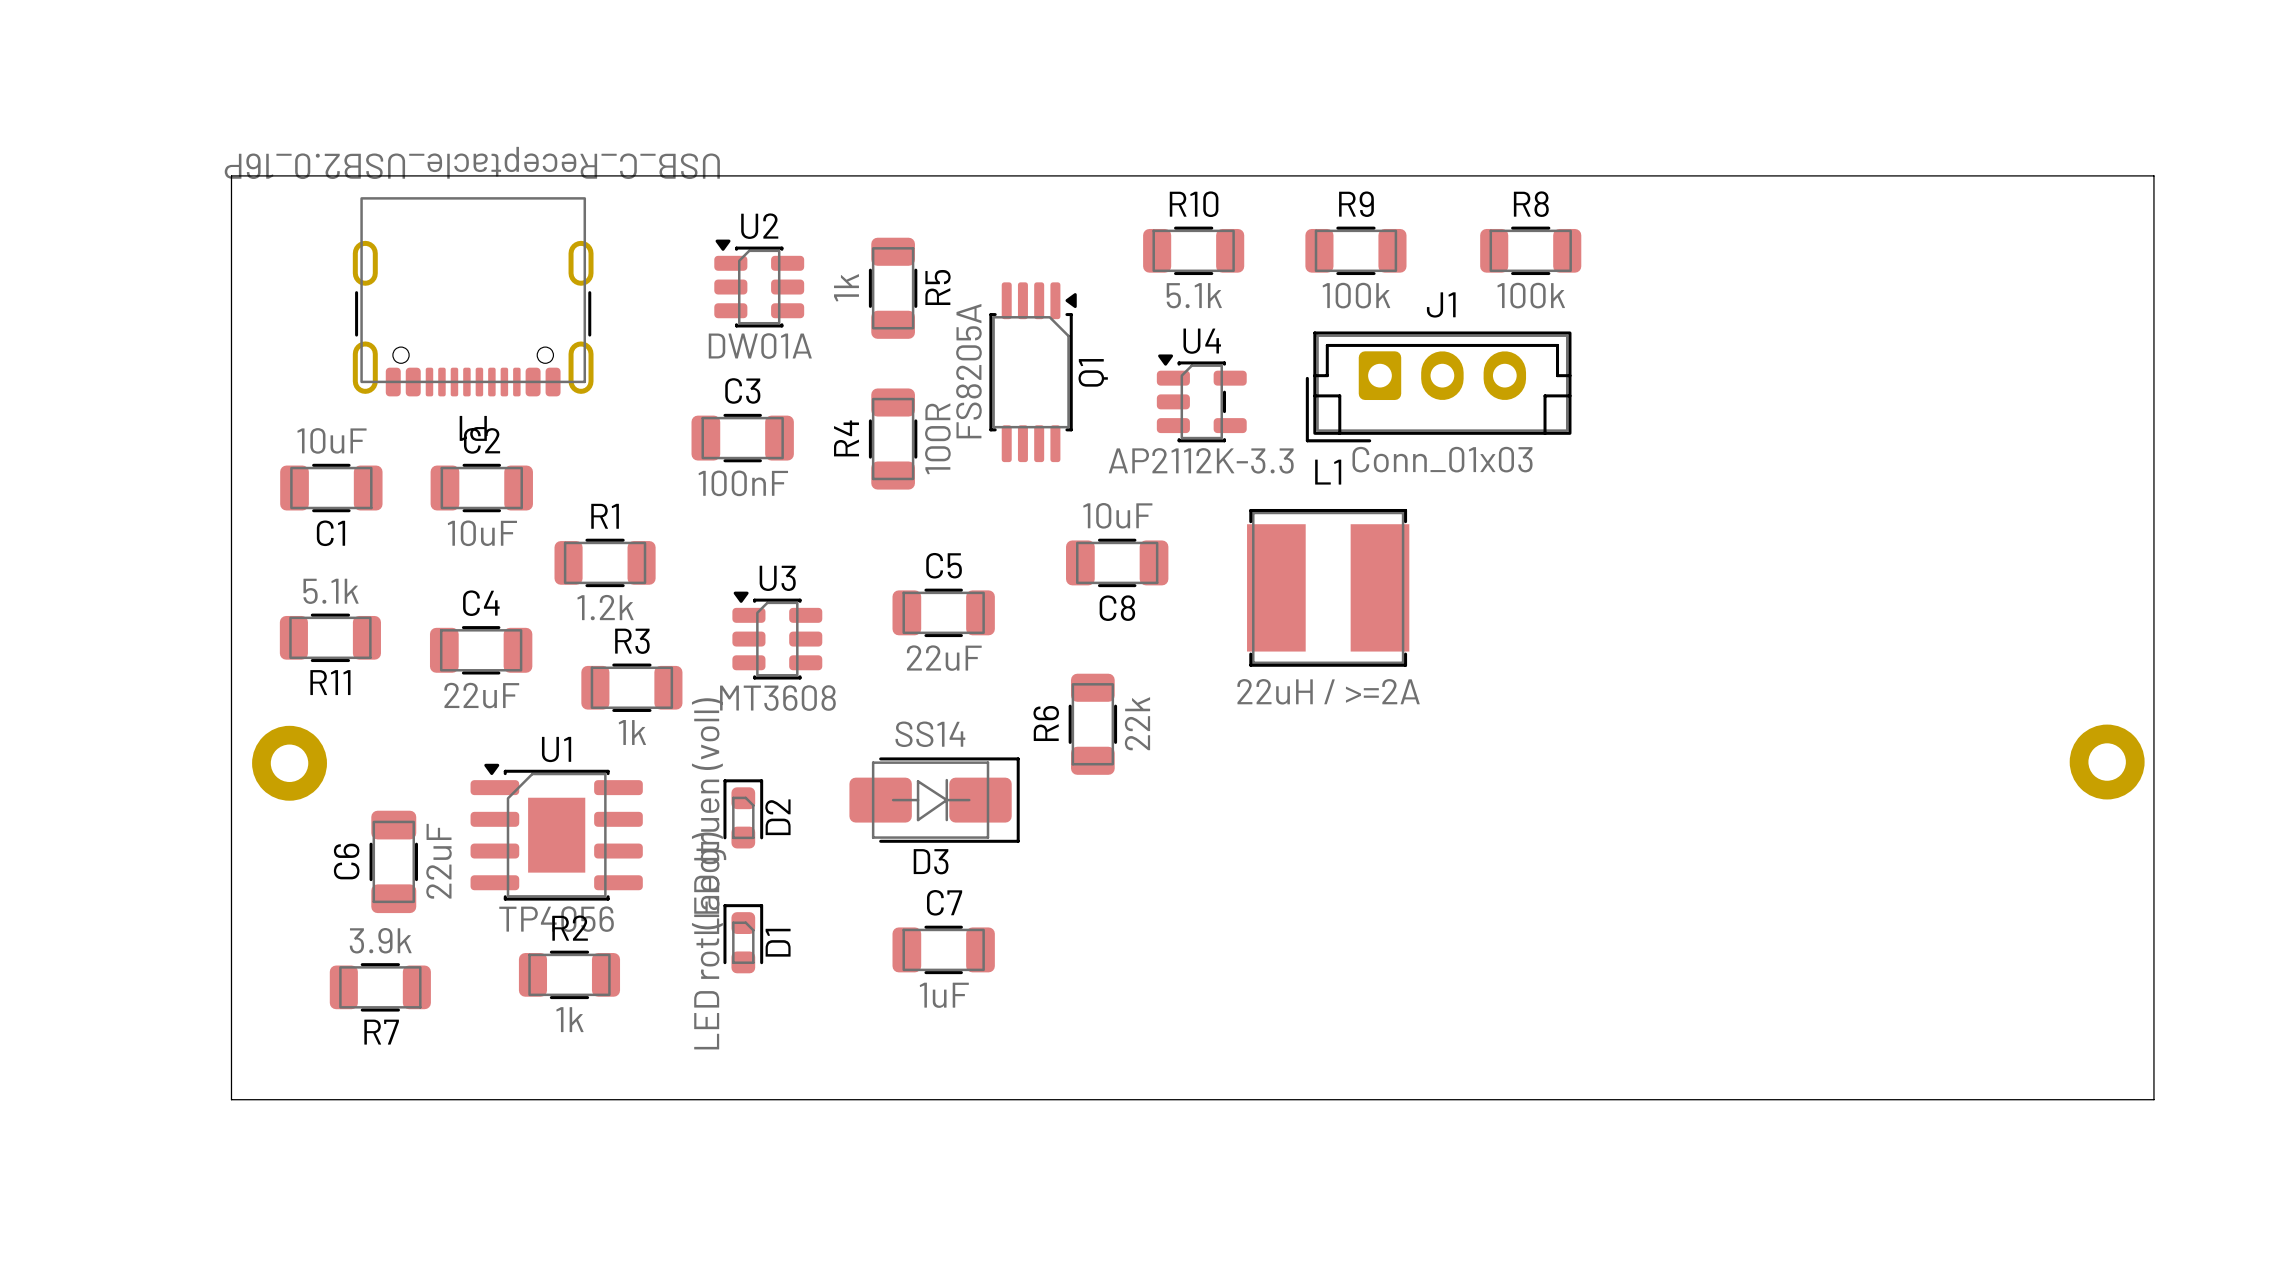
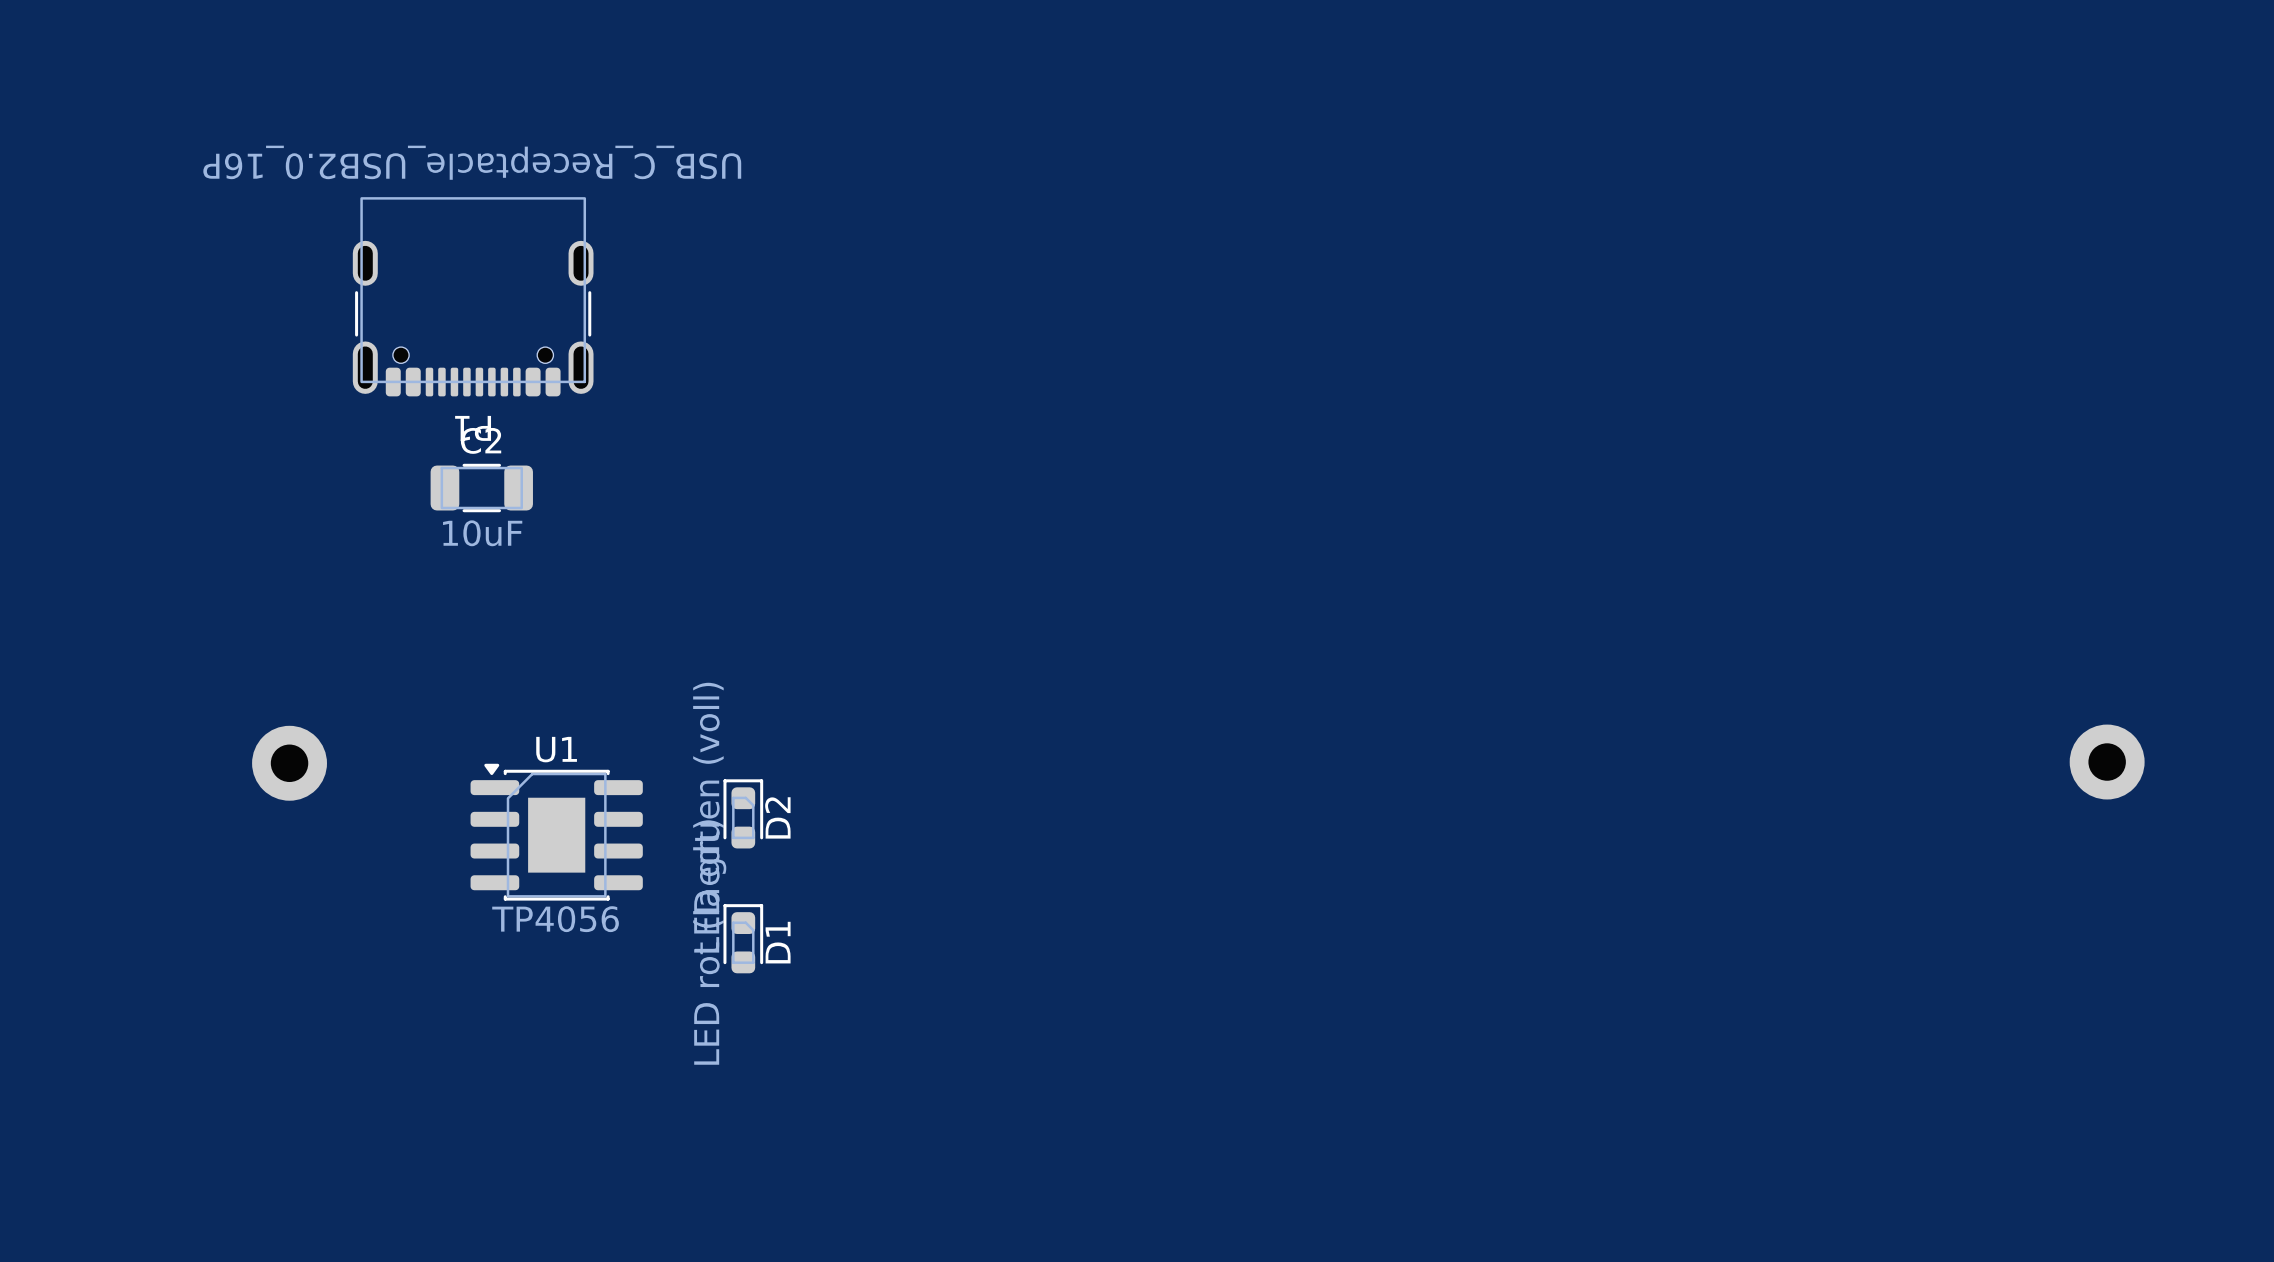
board edge: (231, 175) (2153, 175) (2153, 1099) (231, 1099) (231, 175) -> none
R10: 5.1k (1193, 250) -> none
R9: 100k (1355, 250) -> none
R8: 100k (1530, 250) -> none
U2: DW01A (759, 283) -> none
R5: 1k (893, 288) -> none
Q1: FS8205A (1033, 372) -> none
J1: Conn_01x03 (1438, 386) -> none
U4: AP2112K-3.3 (1201, 398) -> none
C3: 100nF (742, 438) -> none
R4: 100R (893, 439) -> none
C1: 10uF (331, 488) -> none
R1: 1.2k (605, 562) -> none
C8: 10uF (1117, 562) -> none
L1: 22uH / >=2A (1328, 587) -> none
C5: 22uF (943, 612) -> none
U3: MT3608 (777, 635) -> none
R11: 5.1k (330, 637) -> none
C4: 22uF (481, 650) -> none
R3: 1k (631, 687) -> none
R6: 22k (1092, 724) -> none
D3: SS14 (934, 800) -> none
C6: 22uF (393, 861) -> none
C7: 1uF (943, 949) -> none
R2: 1k (569, 974) -> none
R7: 3.9k (380, 987) -> none

